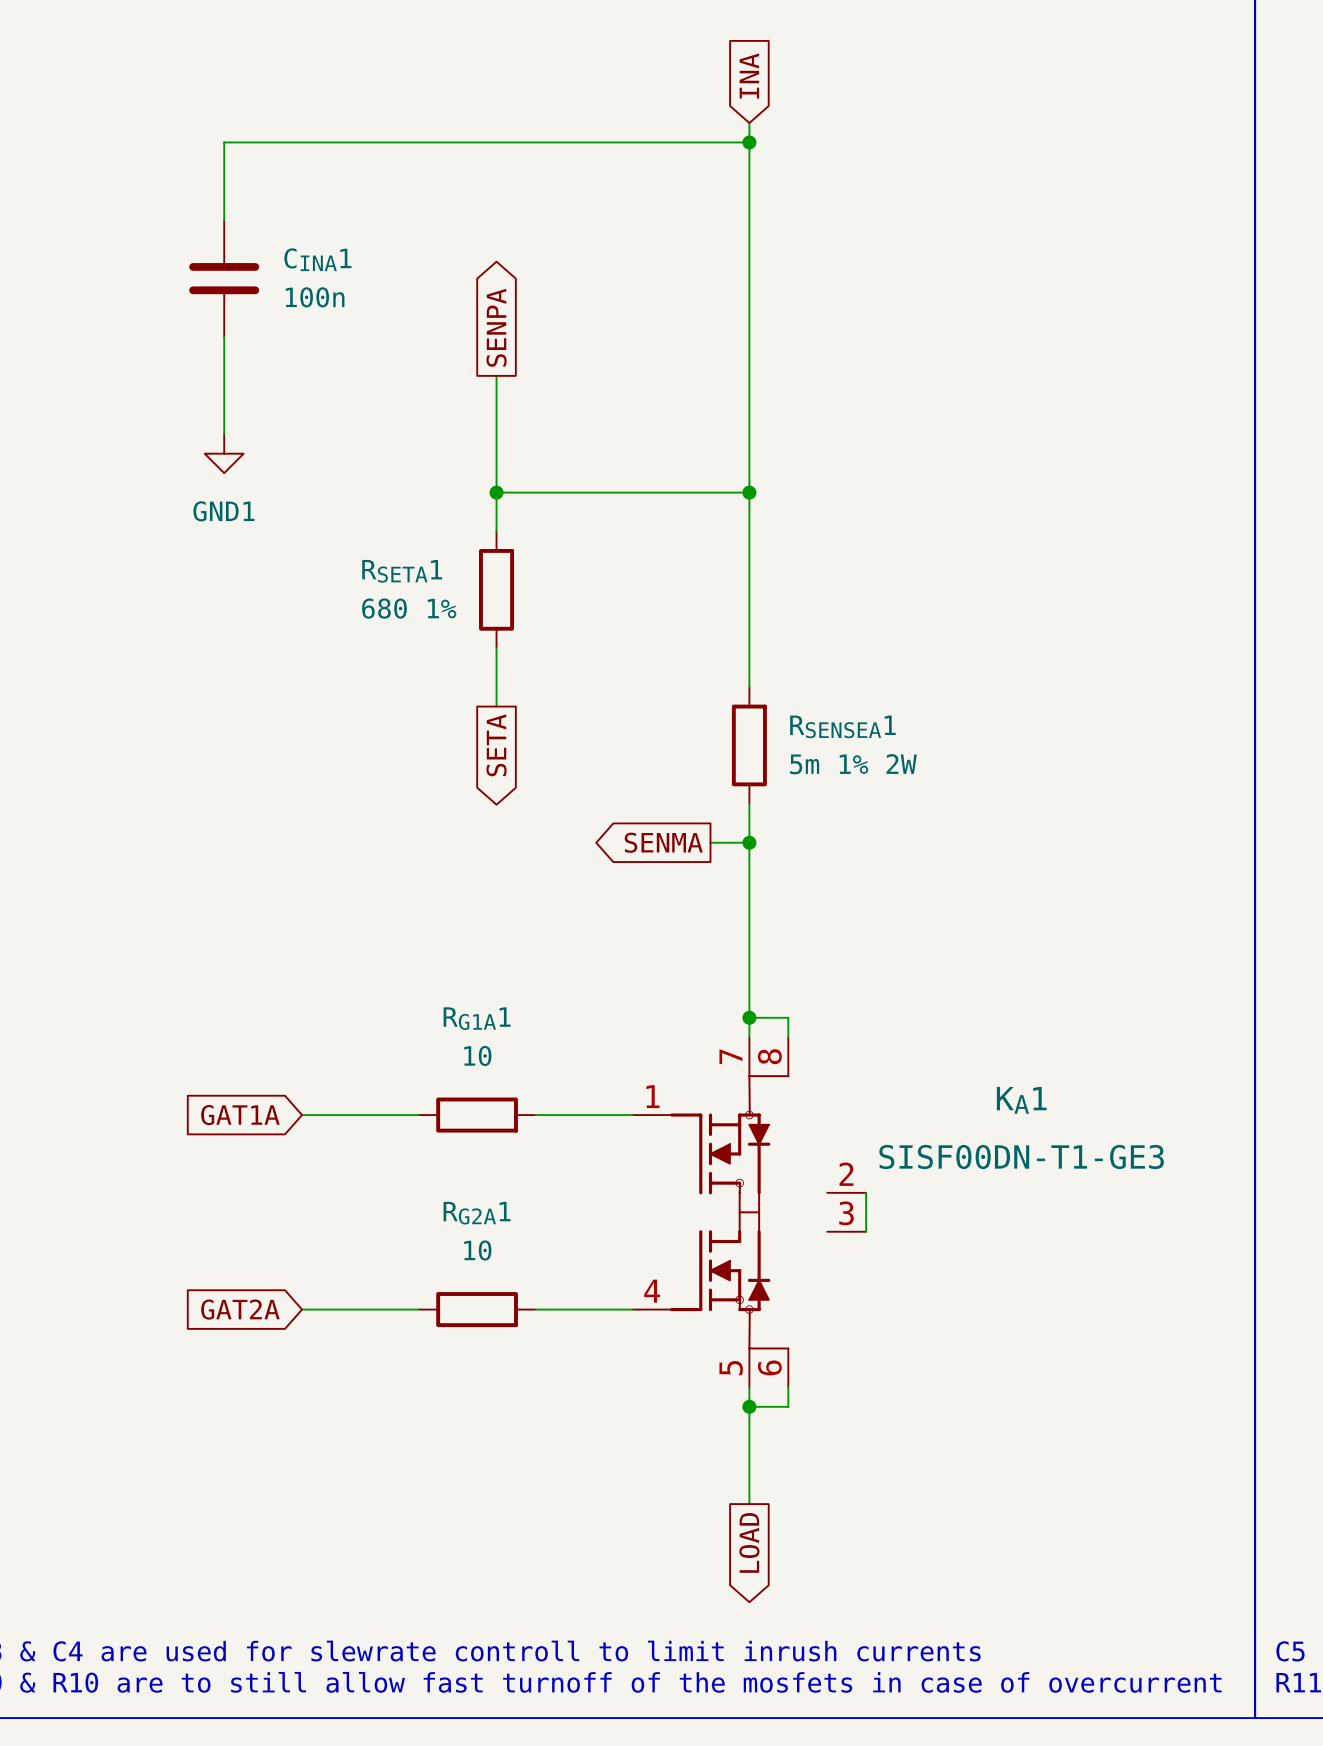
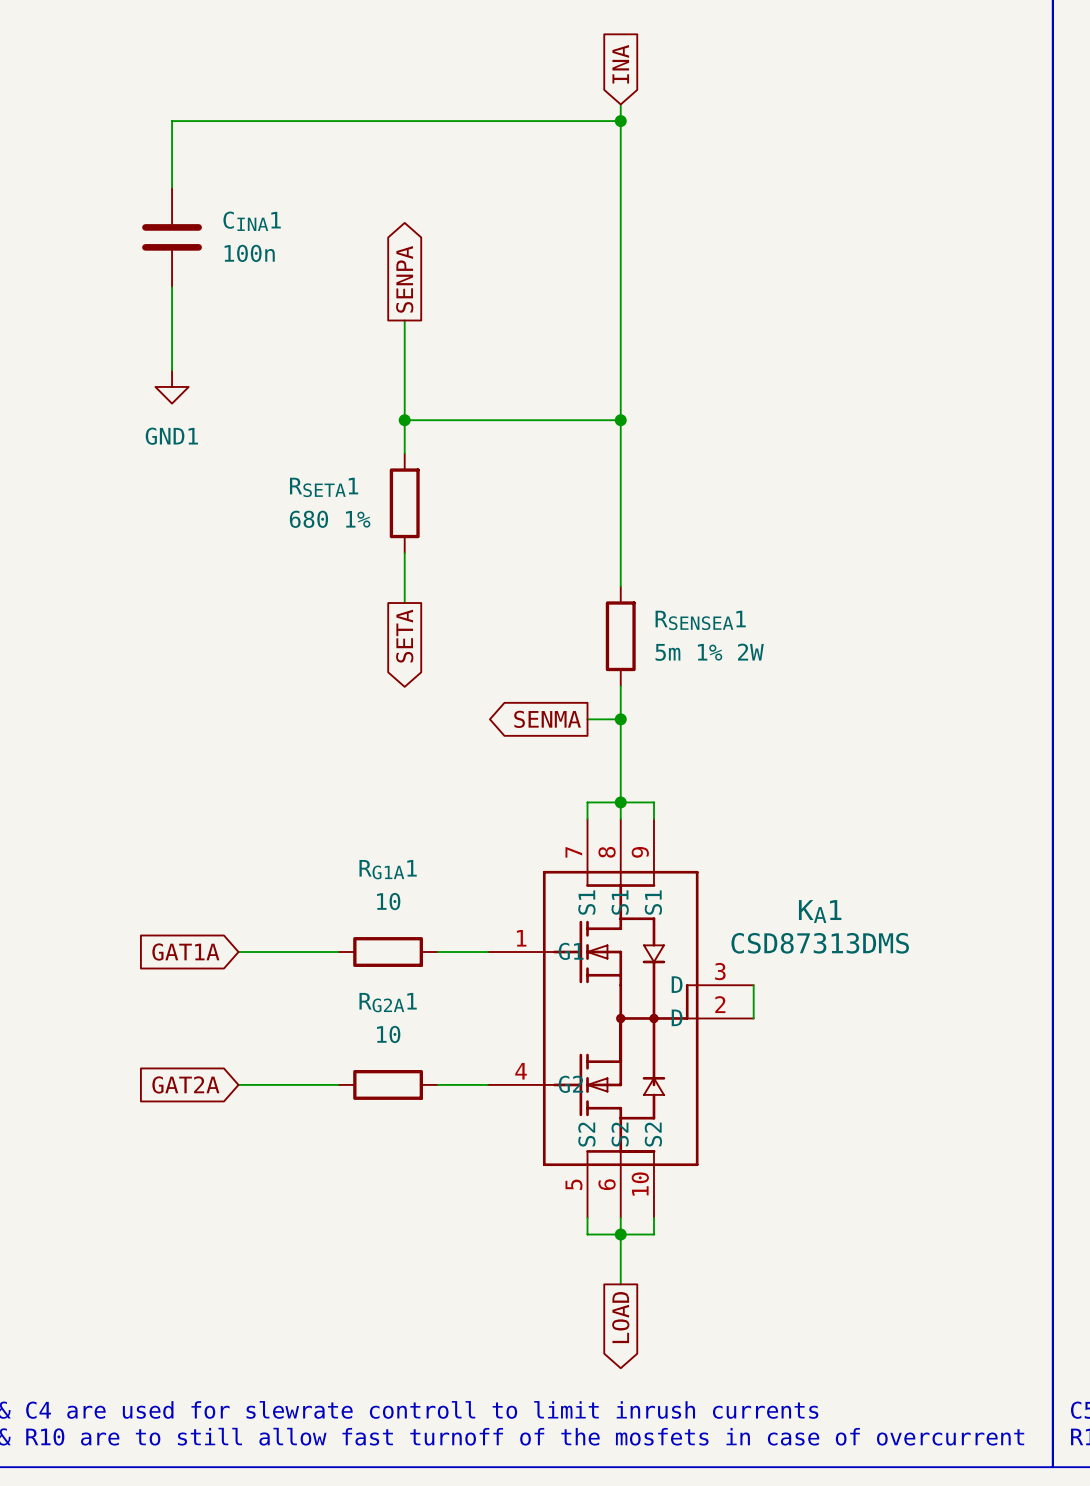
wire: none -> (587, 819) (587, 802) (653, 802) (653, 819)
wire: (749, 1017) (788, 1017) (788, 1037) -> none
junction position: (749, 1017) -> (620, 802)
KA1 symbol: [632, 1037, 867, 1388] -> [487, 819, 754, 1218]
KA1 name position: KA1 (1021, 1100) -> KA1 (820, 911)
KA1 value: SISF00DN-T1-GE3 (1021, 1156) -> CSD87313DMS (820, 943)
wire: (866, 1192) (866, 1231) -> (753, 985) (753, 1018)
wire: none -> (437, 1084) (487, 1084)
global label position: GAT2A (240, 1309) -> GAT2A (185, 1084)
wire: (302, 1309) (418, 1309) -> (238, 1084) (338, 1084)
RG2A1 position: (477, 1309) -> (388, 1084)
wire: (535, 1309) (632, 1309) -> none
wire: (788, 1387) (788, 1406) (749, 1406) -> none
junction position: (749, 1406) -> (620, 1234)
wire: none -> (587, 1217) (587, 1234) (653, 1234) (653, 1217)

